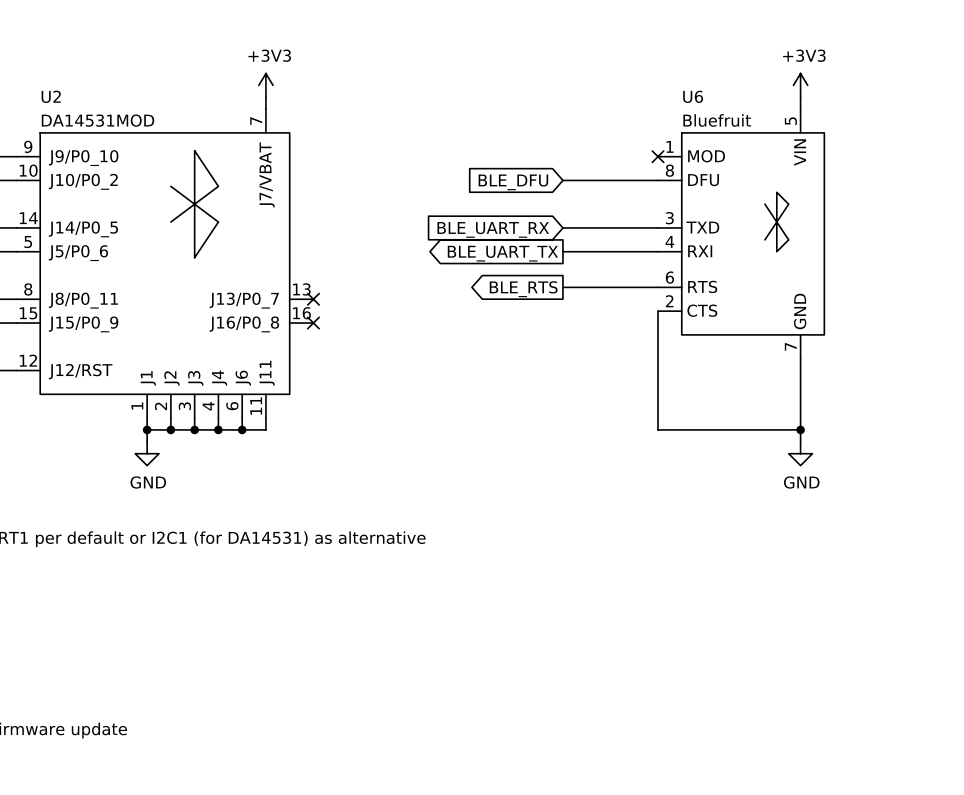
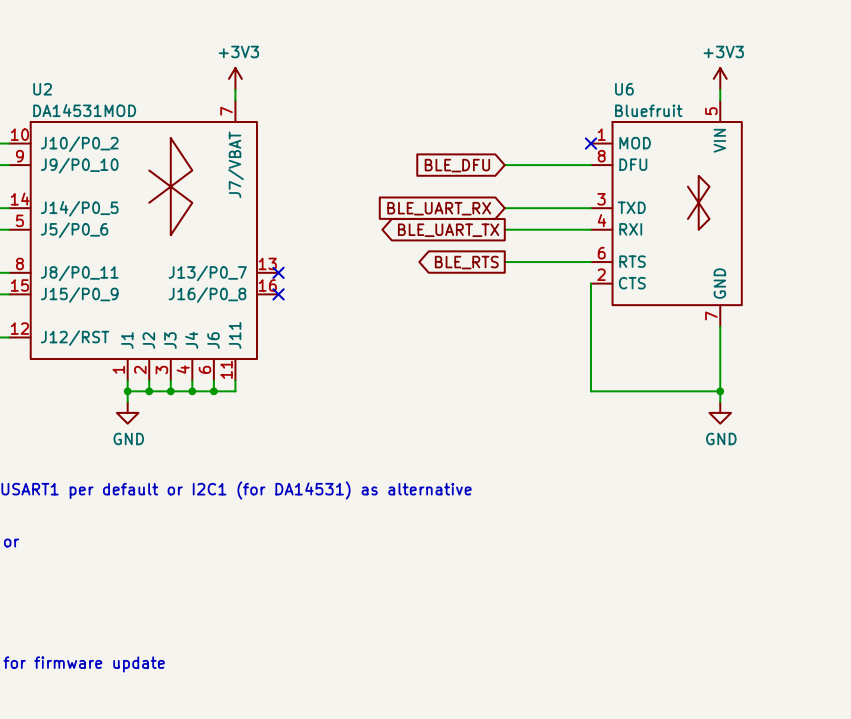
U2 pin number: 9 (28, 146) -> 10 (19, 134)
U2 pin name: J9/P0_10 (83, 158) -> J10/P0_2 (79, 144)
U2 pin number: 10 (28, 170) -> 9 (19, 156)
U2 pin name: J10/P0_2 (83, 181) -> J9/P0_10 (79, 165)

